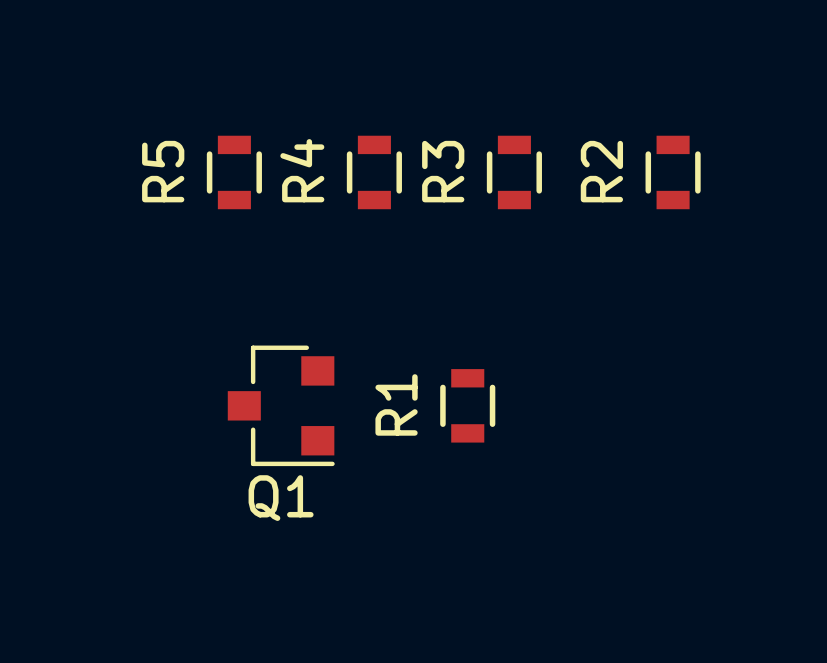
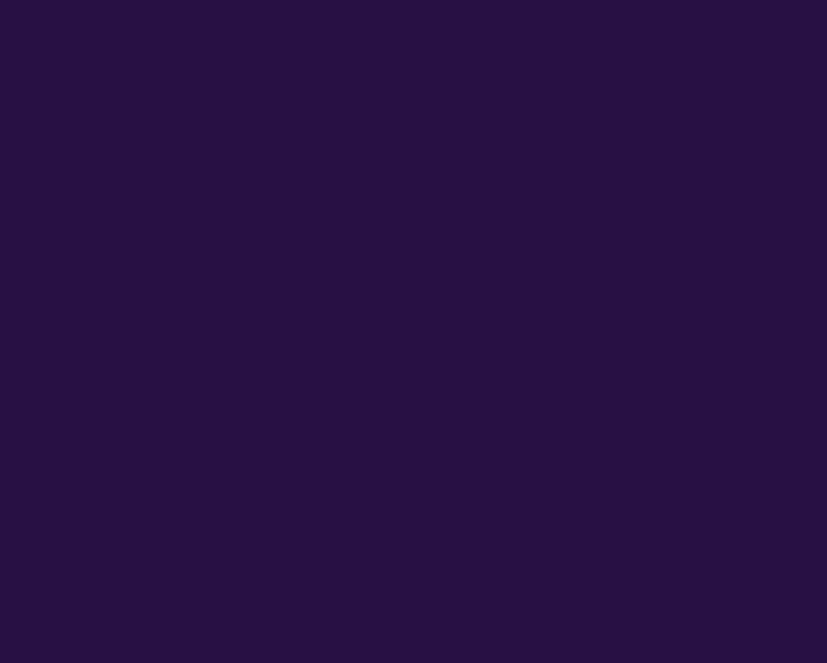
R5: (234, 172) -> none
R4: (374, 172) -> none
R3: (514, 172) -> none
R2: (673, 172) -> none
Q1: (281, 405) -> none
R1: (467, 405) -> none

